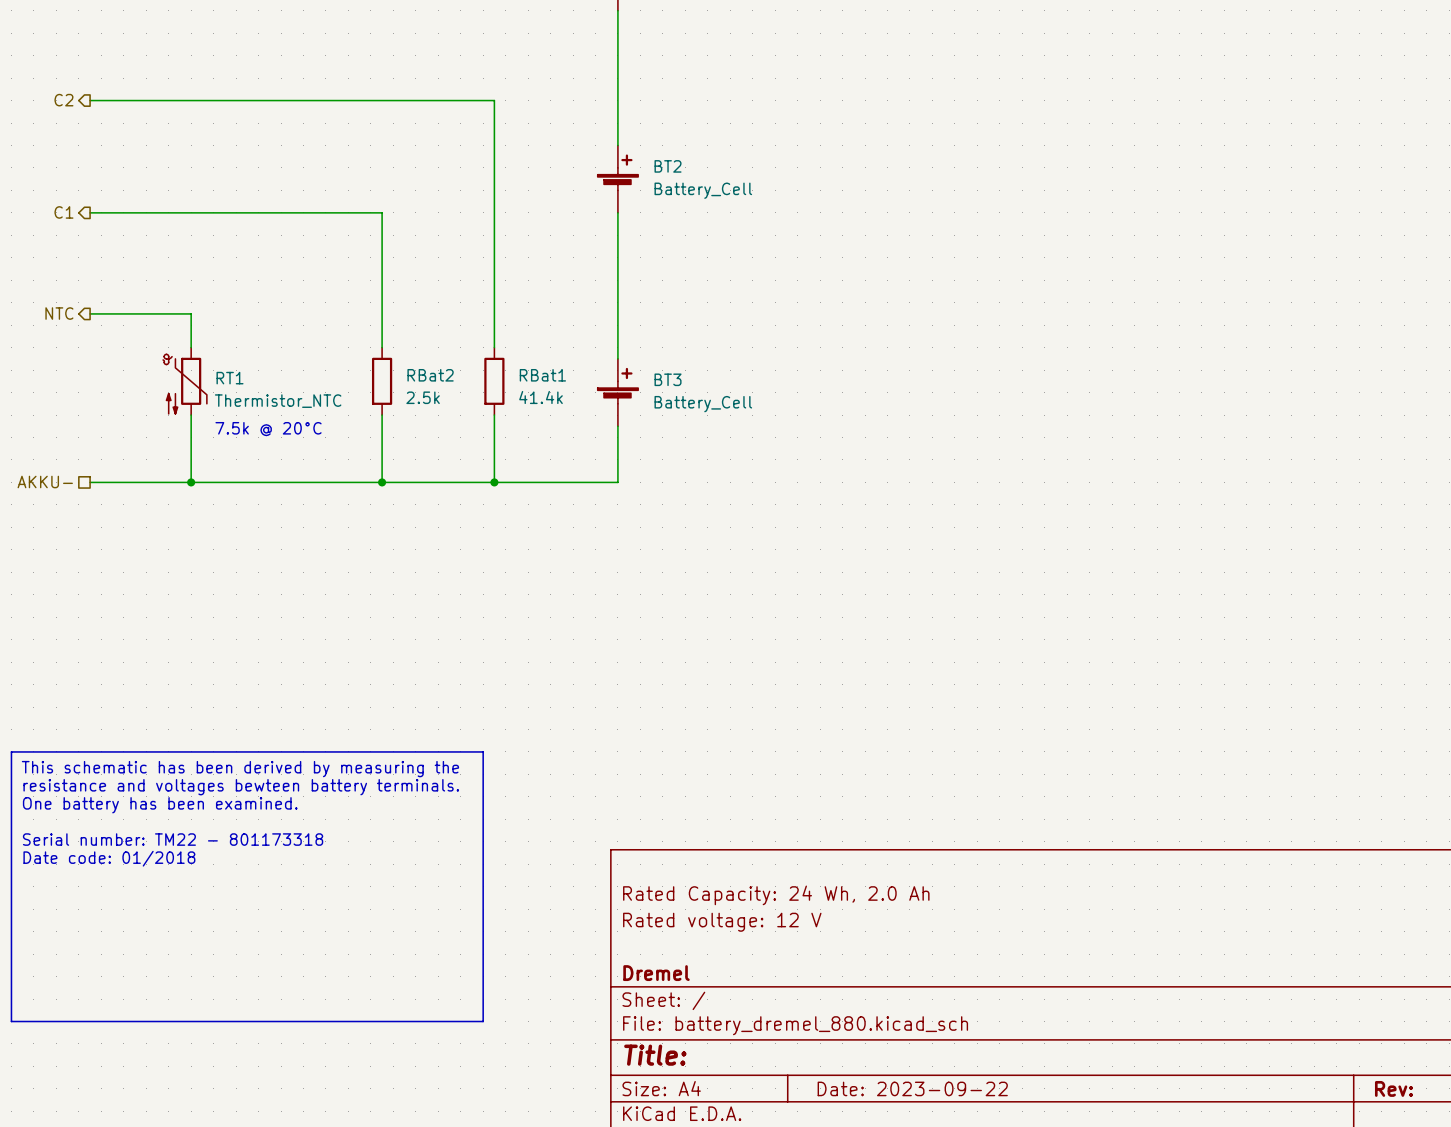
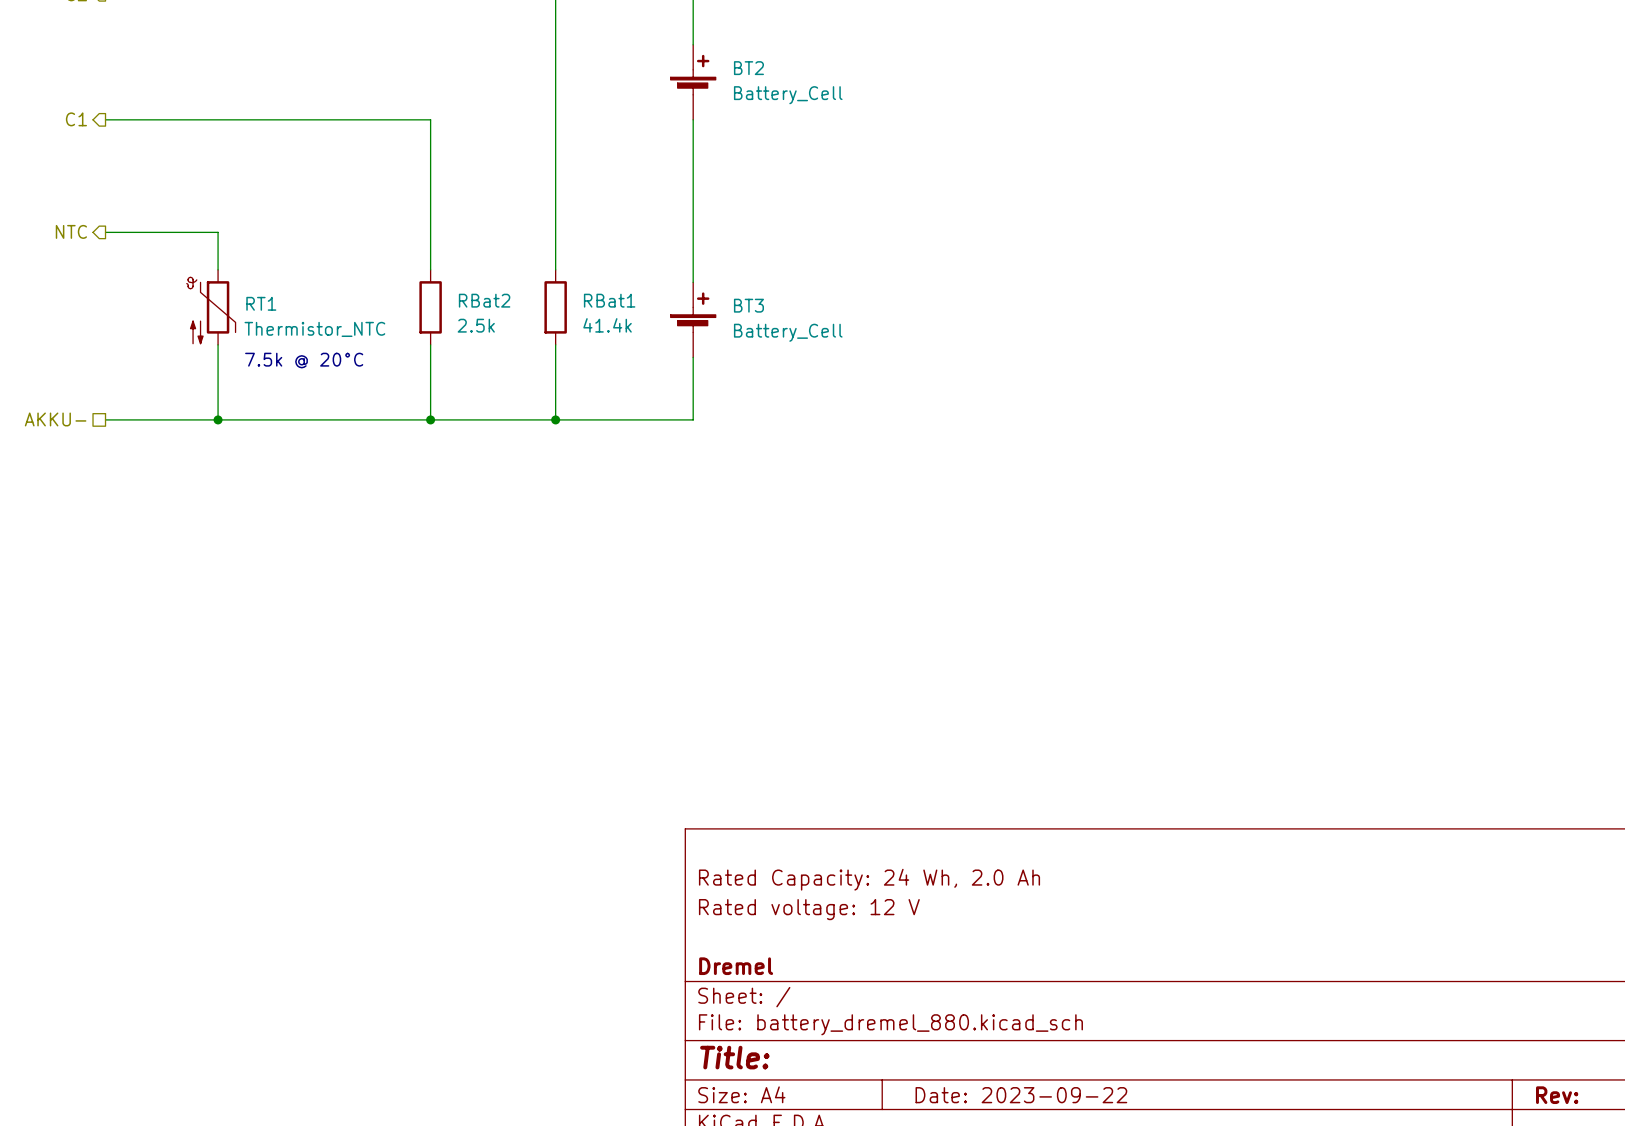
line: (11, 751) (483, 751) (483, 1021) (11, 1021) (11, 751) -> none
text: This schematic has been derived by measuring the (240, 769) -> none
text: resistance and voltages bewteen battery terminals. (241, 787) -> none
text: One battery has been examined. (160, 805) -> none
text: Serial number: TM22 - 801173318 (173, 839) -> none
text: Date code: 01/2018 (109, 858) -> none

